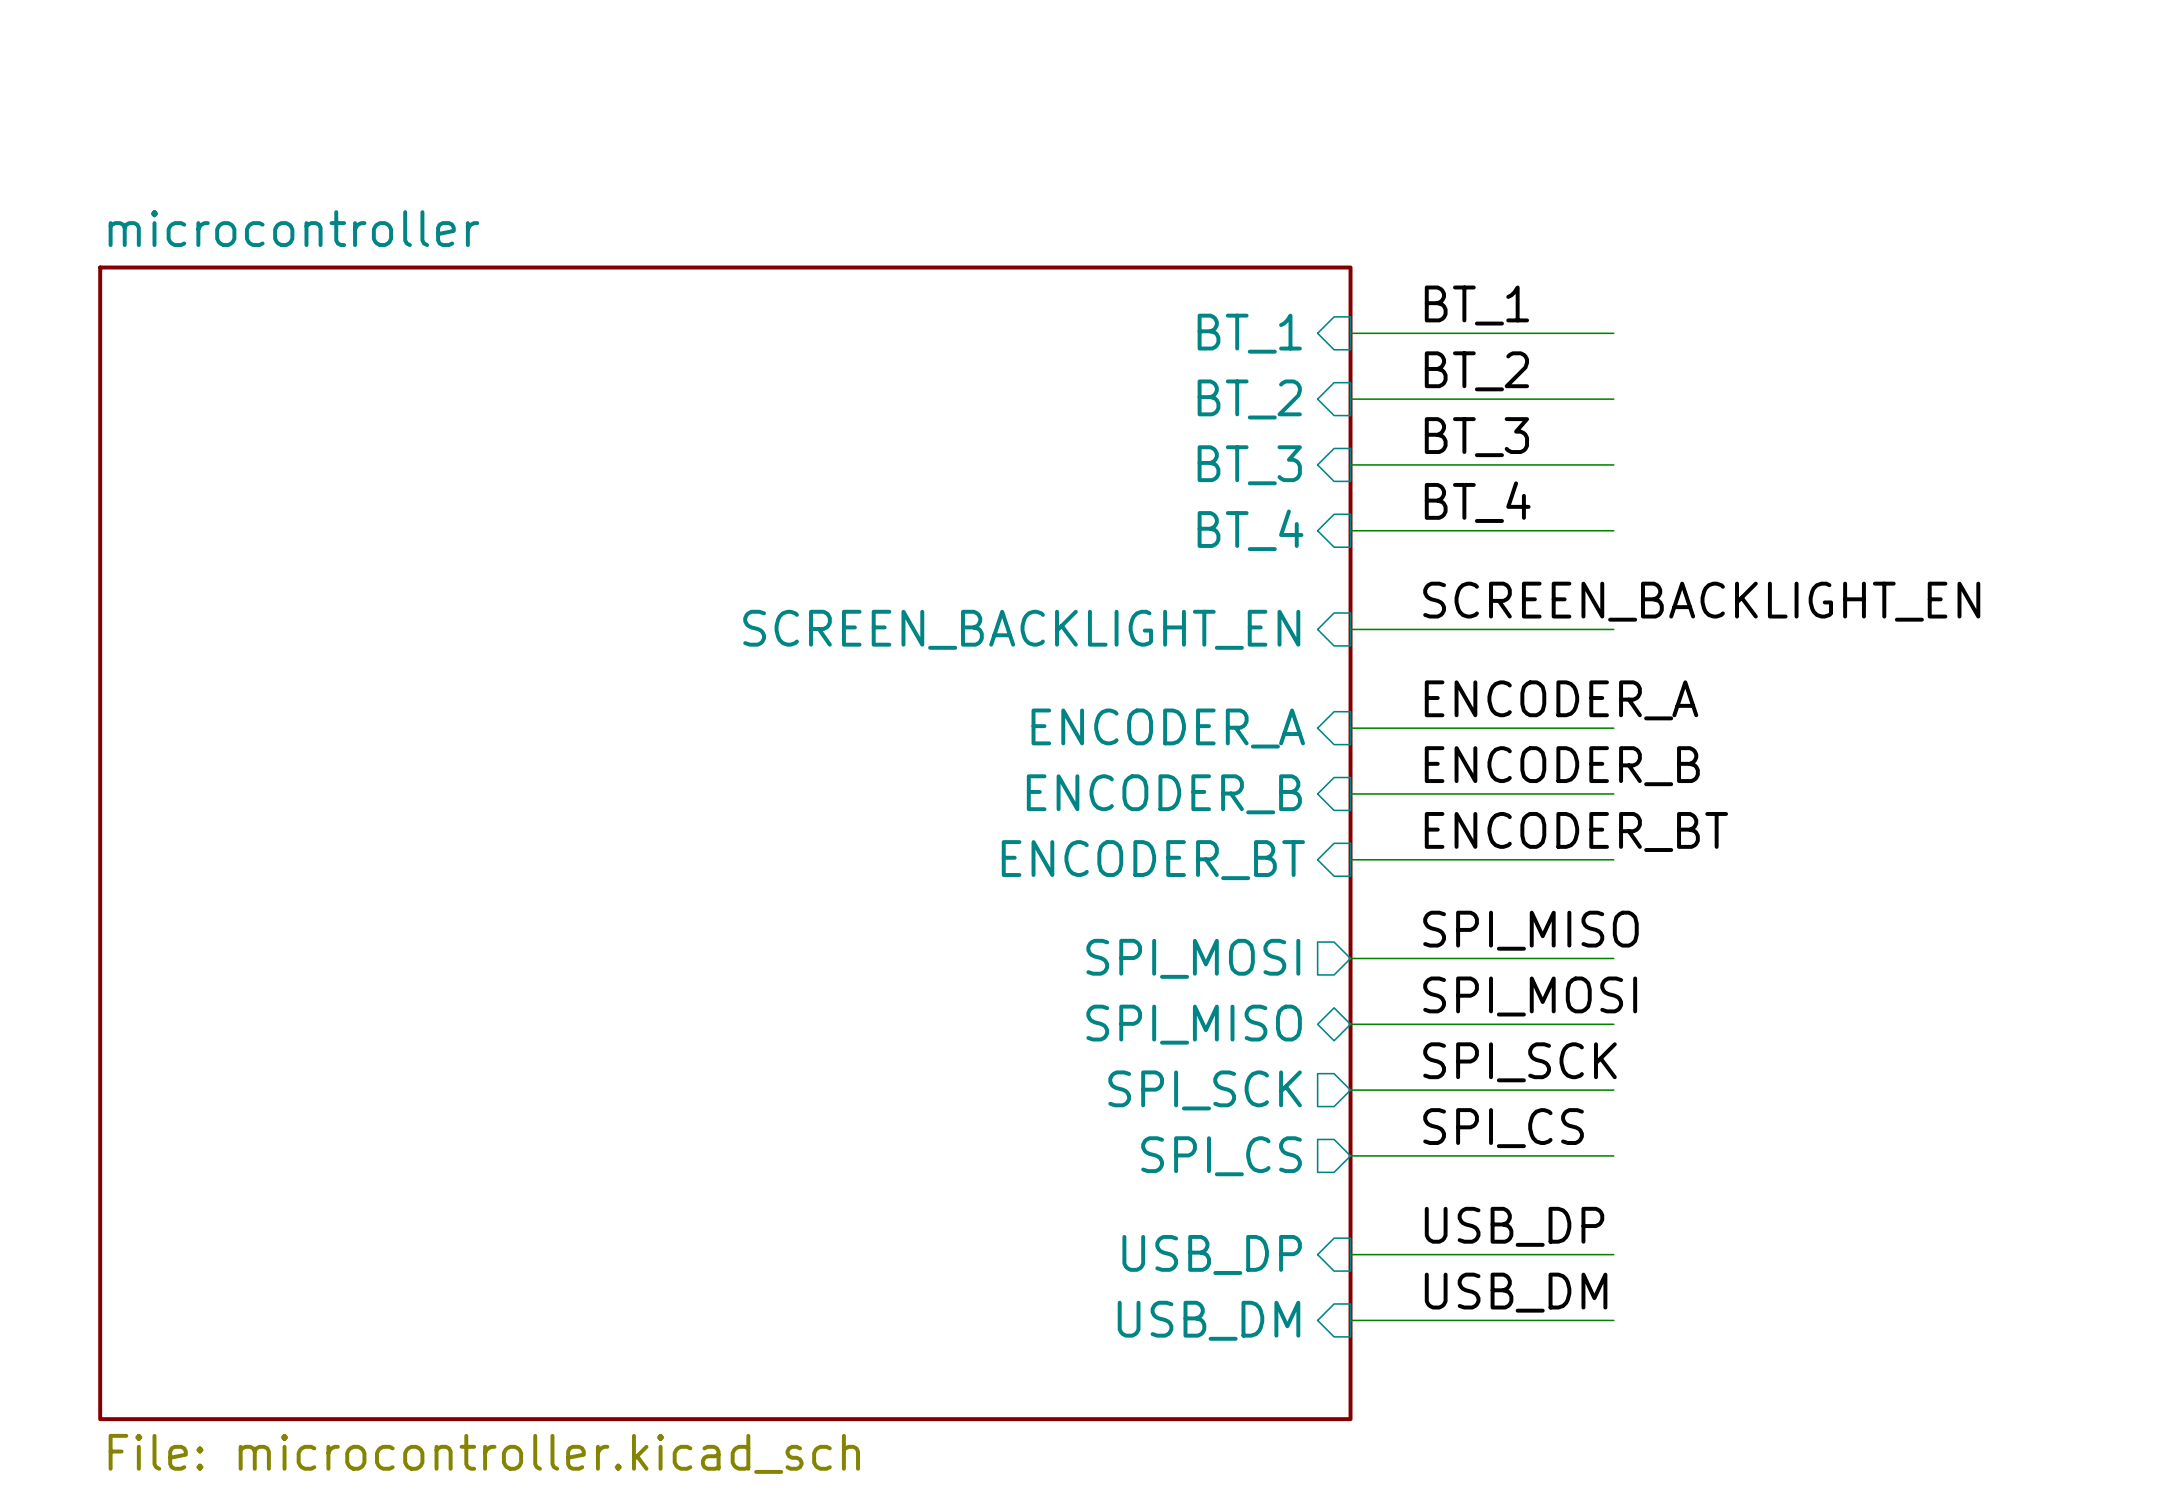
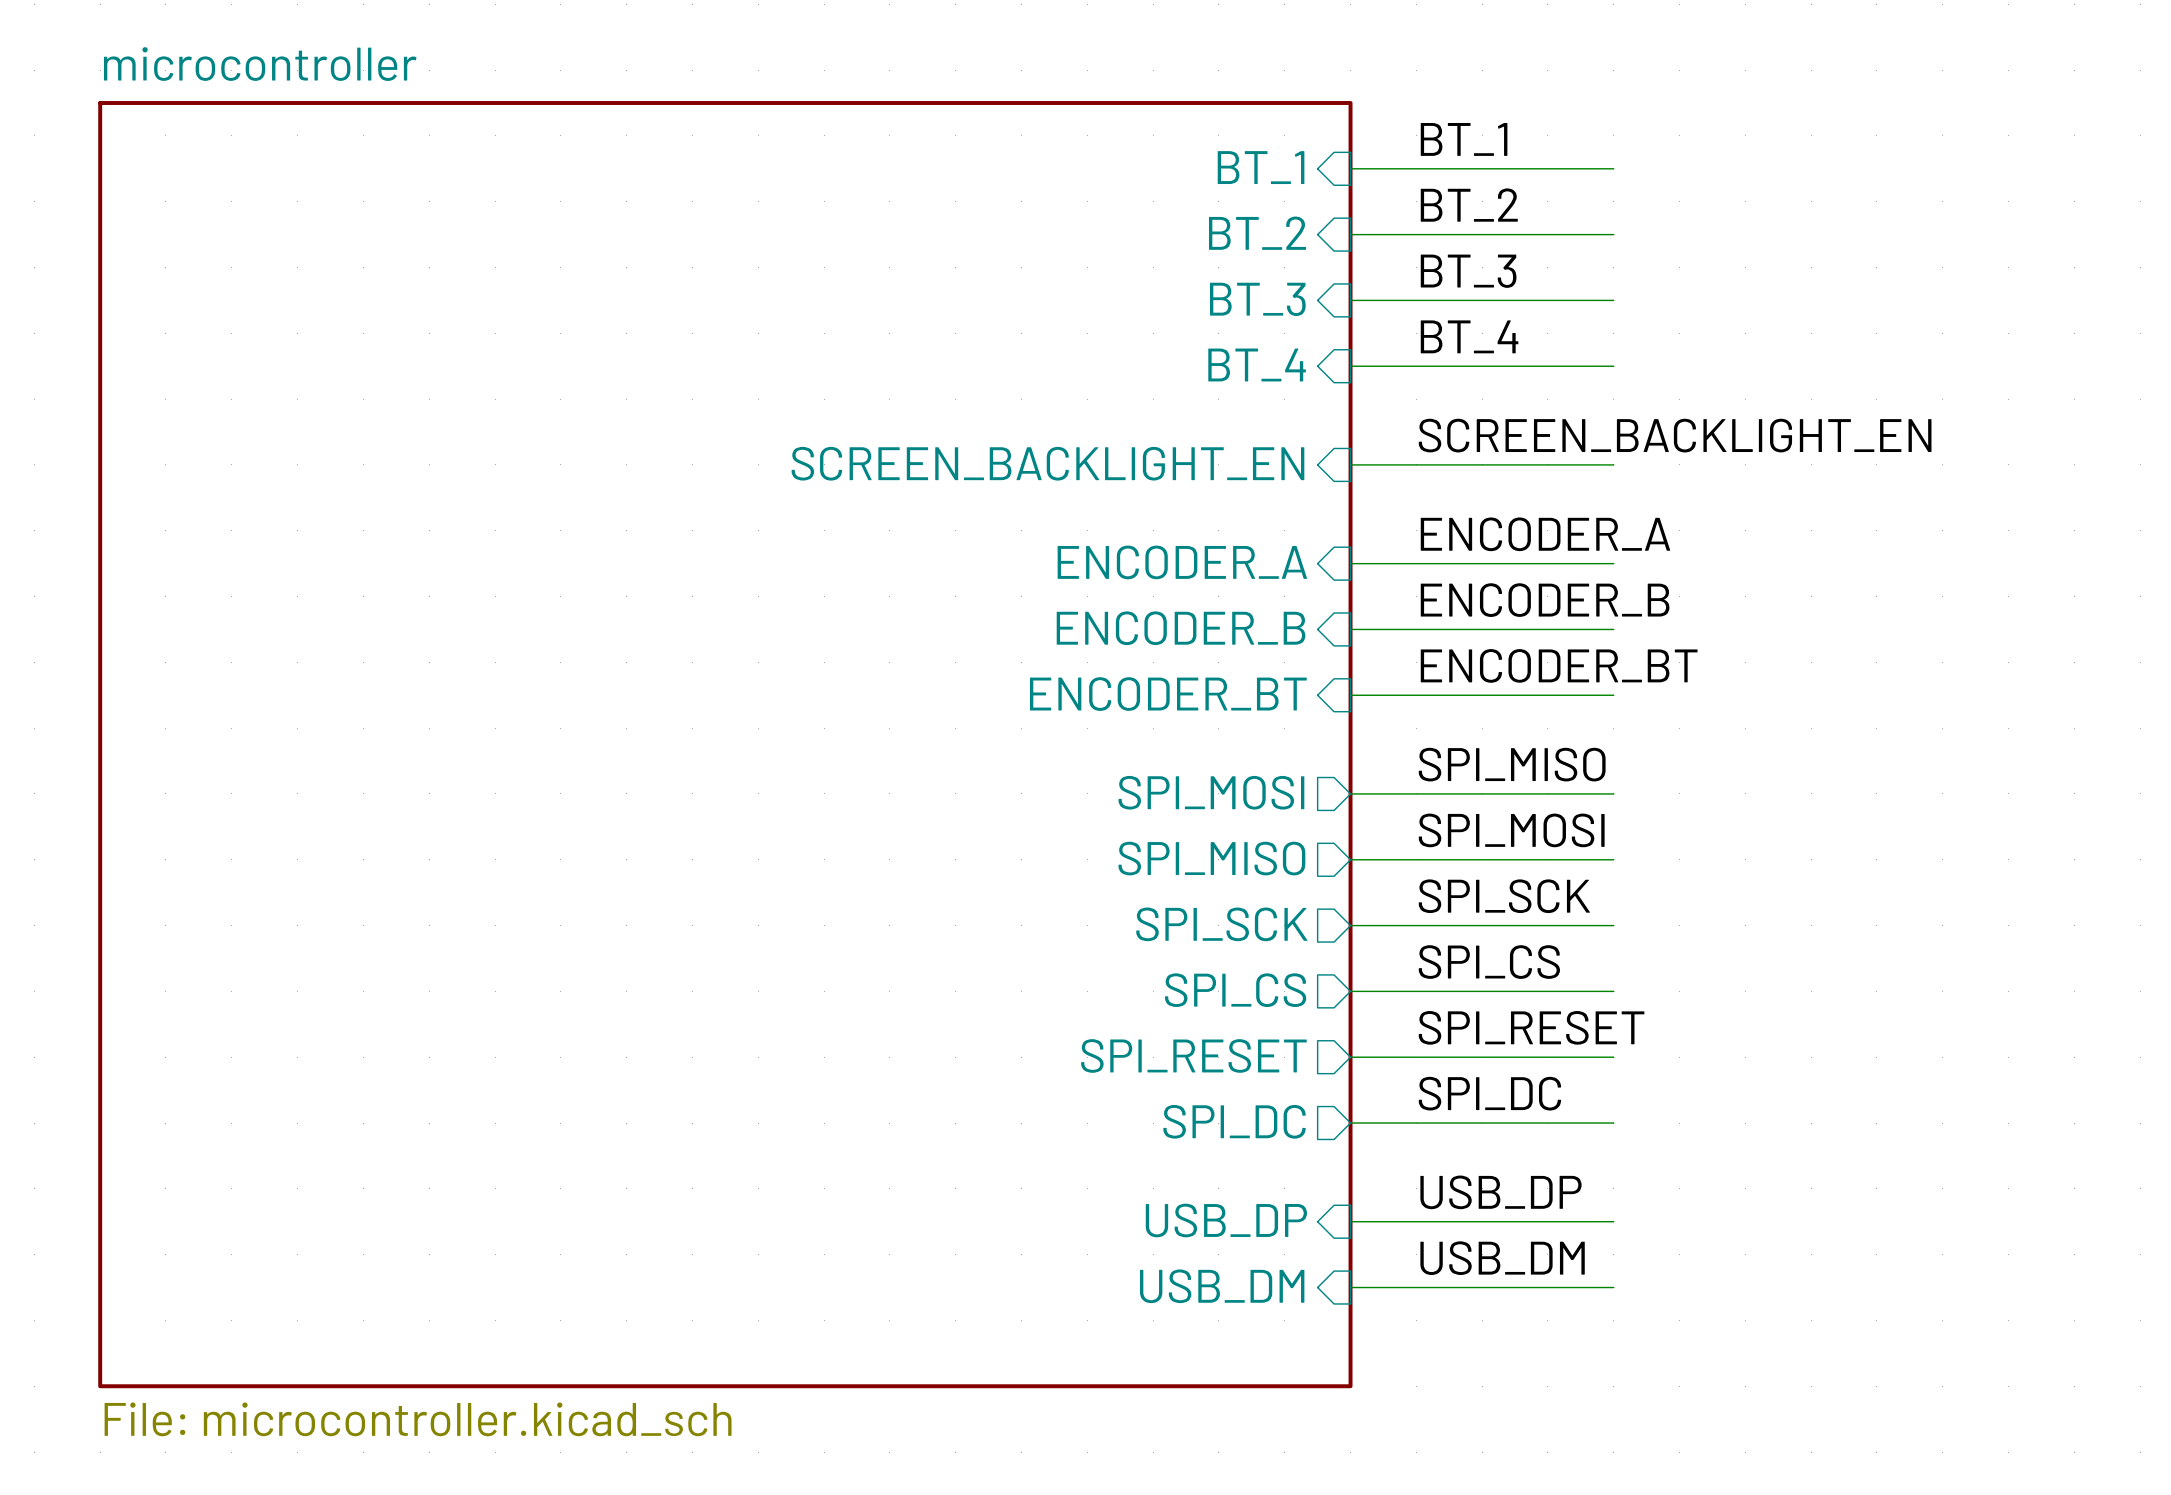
wire: none -> (1350, 168) (1613, 168)
wire: none -> (1350, 234) (1613, 234)
label: none -> BT_3 (1468, 271)
sheet pin: none -> BT_3 (1257, 299)
label position: BT_1 (1476, 305) -> BT_1 (1464, 139)
sheet pin position: BT_1 (1249, 333) -> BT_1 (1261, 167)
wire: (1350, 333) (1613, 333) -> (1350, 300) (1613, 300)
label position: BT_2 (1476, 371) -> BT_2 (1469, 205)
sheet pin position: BT_2 (1249, 399) -> BT_2 (1257, 233)
wire: (1350, 399) (1613, 399) -> (1350, 366) (1613, 366)
label: BT_3 (1476, 437) -> SCREEN_BACKLIGHT_EN (1675, 435)
sheet pin: BT_3 (1249, 465) -> SCREEN_BACKLIGHT_EN (1047, 463)
label position: BT_4 (1477, 502) -> BT_4 (1469, 336)
sheet pin position: BT_4 (1250, 530) -> BT_4 (1257, 364)
wire: (1350, 530) (1613, 530) -> (1350, 563) (1613, 563)
label: SCREEN_BACKLIGHT_EN (1701, 601) -> ENCODER_B (1545, 600)
sheet pin: SCREEN_BACKLIGHT_EN (1021, 629) -> ENCODER_B (1181, 628)
label: none -> ENCODER_BT (1559, 665)
sheet pin: none -> ENCODER_BT (1168, 694)
label position: ENCODER_A (1561, 700) -> ENCODER_A (1545, 534)
sheet pin position: ENCODER_A (1168, 728) -> ENCODER_A (1182, 562)
wire: (1350, 728) (1613, 728) -> (1350, 695) (1613, 695)
sheet microcontroller: none -> File: microcontroller.kicad_sch (725, 744)
label: ENCODER_B (1562, 766) -> SPI_MISO (1512, 764)
sheet pin shape: input (1164, 794) -> output (1211, 792)
sheet pin: ENCODER_B (1164, 794) -> SPI_MOSI (1211, 792)
label: ENCODER_BT (1576, 831) -> SPI_MOSI (1511, 830)
sheet microcontroller: File: microcontroller.kicad_sch (725, 843) -> none
sheet pin shape: input (1153, 860) -> output (1211, 858)
sheet pin: ENCODER_BT (1153, 860) -> SPI_MISO (1211, 858)
label: SPI_MISO (1530, 930) -> none
sheet pin: SPI_MOSI (1193, 958) -> none
wire: (1350, 958) (1613, 958) -> (1350, 925) (1613, 925)
label: SPI_MOSI (1530, 996) -> none
sheet pin: SPI_MISO (1194, 1024) -> none
wire: (1350, 1024) (1613, 1024) -> (1350, 991) (1613, 991)
label: none -> SPI_RESET (1531, 1027)
sheet pin: none -> SPI_RESET (1193, 1055)
label position: SPI_SCK (1520, 1062) -> SPI_SCK (1504, 896)
sheet pin position: SPI_SCK (1205, 1090) -> SPI_SCK (1221, 924)
wire: (1350, 1090) (1613, 1090) -> (1350, 1057) (1613, 1057)
label: none -> SPI_DC (1489, 1093)
sheet pin: none -> SPI_DC (1234, 1121)
label position: SPI_CS (1503, 1128) -> SPI_CS (1489, 962)
wire: (1350, 1155) (1613, 1155) -> (1350, 1123) (1613, 1123)
sheet pin position: SPI_CS (1221, 1156) -> SPI_CS (1235, 990)
label position: USB_DP (1514, 1226) -> USB_DP (1500, 1192)
sheet pin position: USB_DP (1212, 1254) -> USB_DP (1226, 1220)
wire: (1350, 1254) (1613, 1254) -> (1350, 1221) (1613, 1221)
label position: USB_DM (1516, 1292) -> USB_DM (1502, 1258)
sheet pin position: USB_DM (1209, 1320) -> USB_DM (1222, 1286)
wire: (1350, 1320) (1613, 1320) -> (1350, 1287) (1613, 1287)

